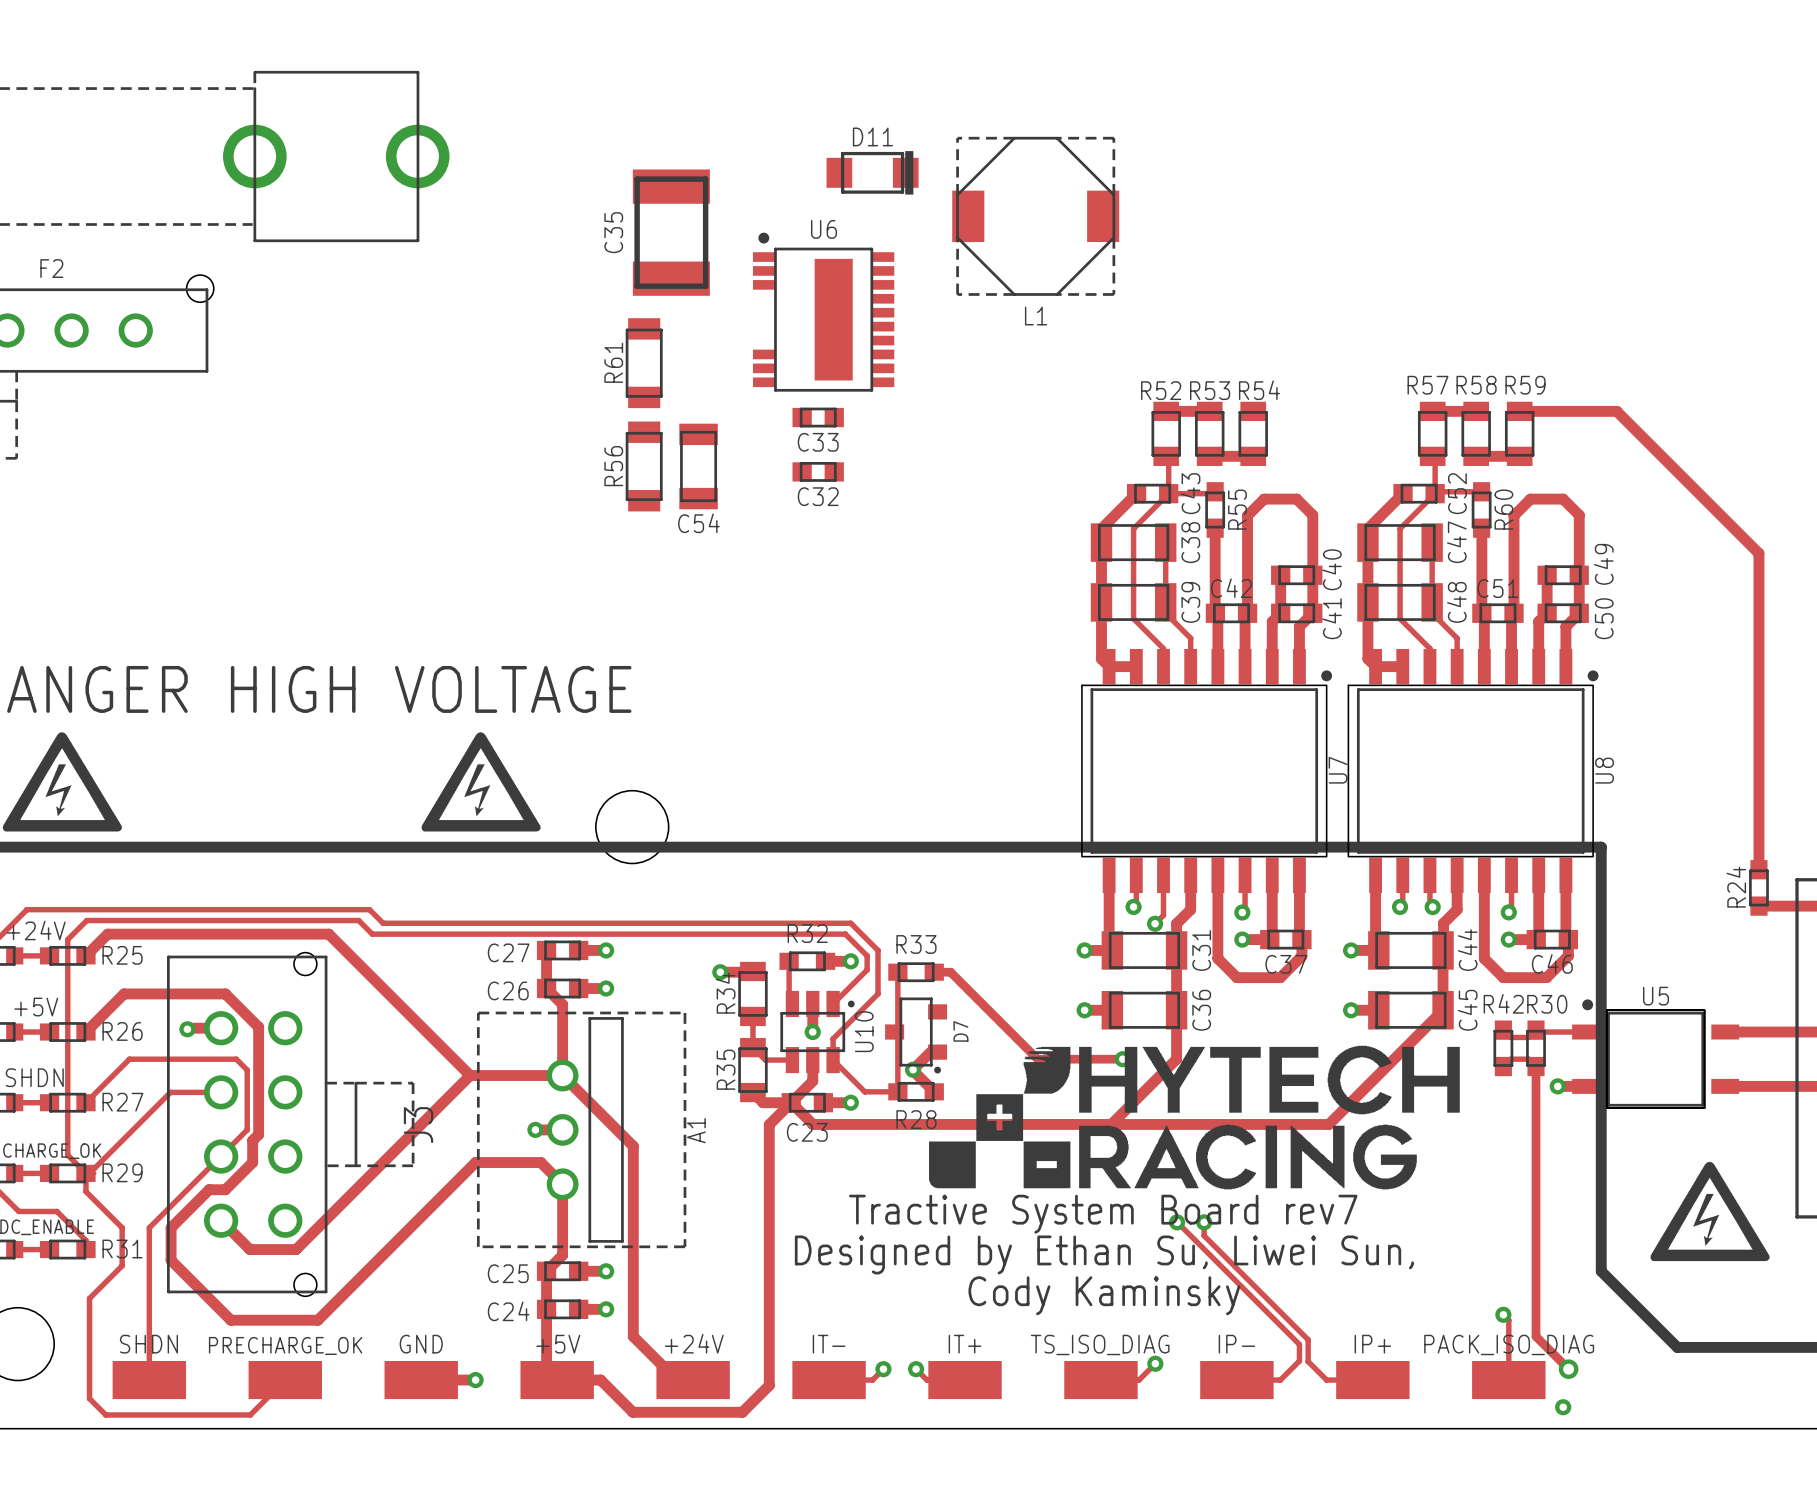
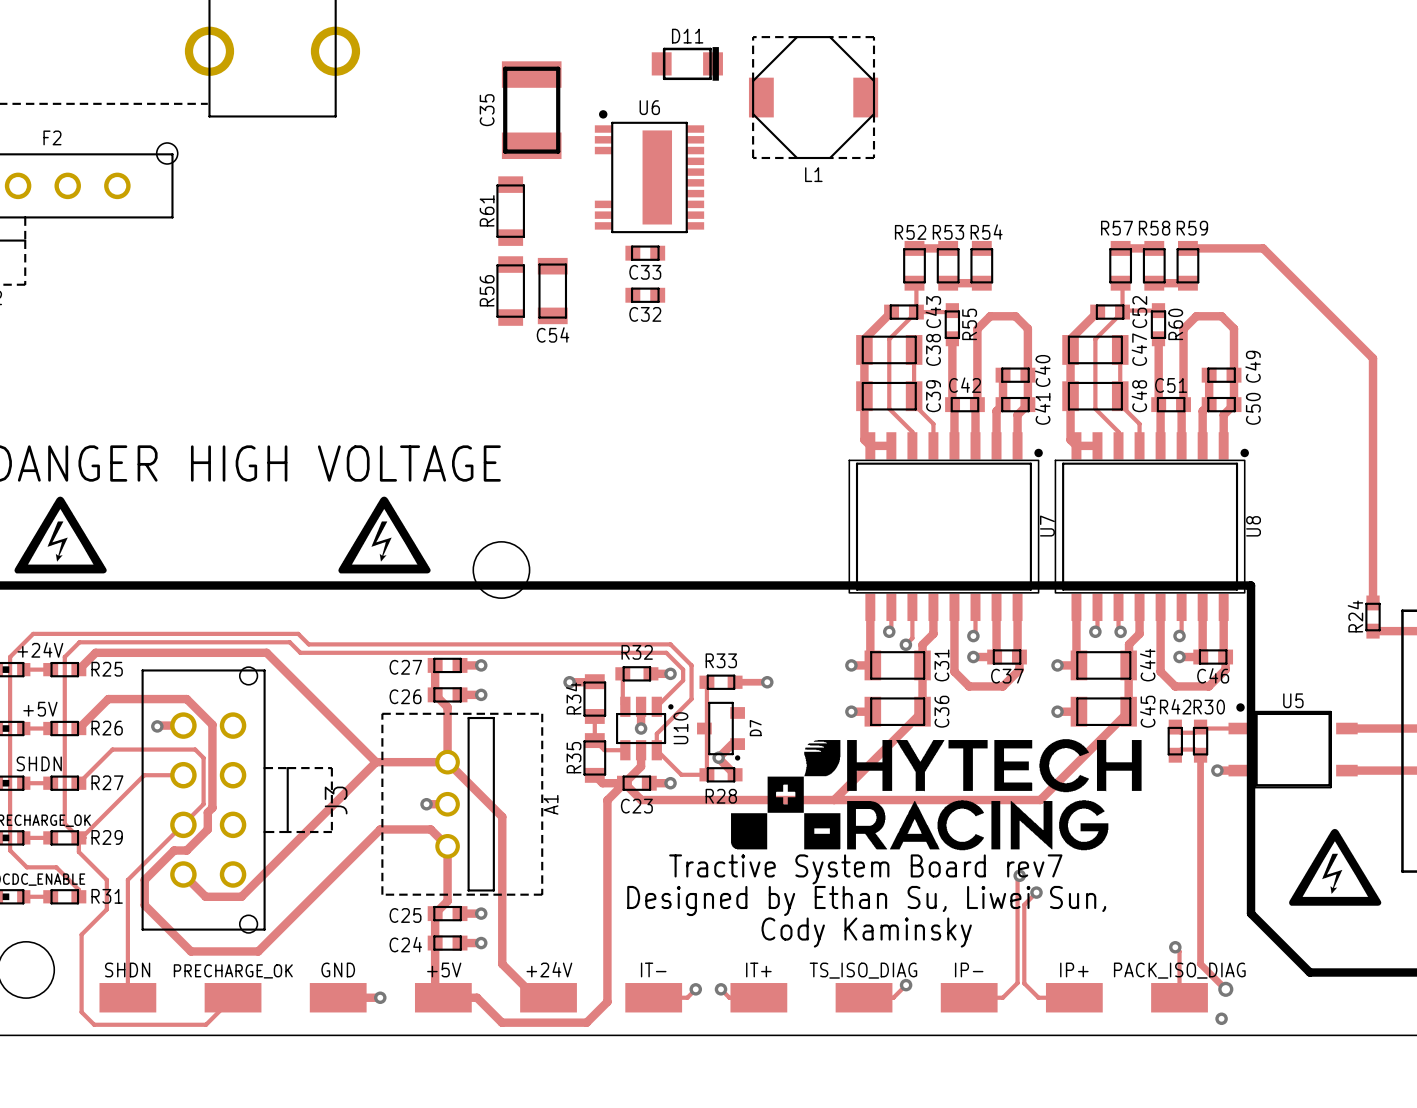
track: (950, 972) (1037, 1059) (1122, 1059) -> (747, 682) (767, 682)
via: none -> (767, 682)
track: (1176, 1010) (1176, 1059) (1111, 1124) -> (922, 711) (834, 800)
via: (1122, 1059) -> none
track: (1177, 1222) (1299, 1344) -> (1019, 875) (1017, 877) (1017, 970)
via: (1177, 1222) -> none
track: (1204, 1222) (1204, 1235) (1308, 1339) -> (1036, 892) (1024, 904) (1024, 966)
via: (1204, 1222) -> none
via: none -> (1019, 875)
via: none -> (1036, 892)

